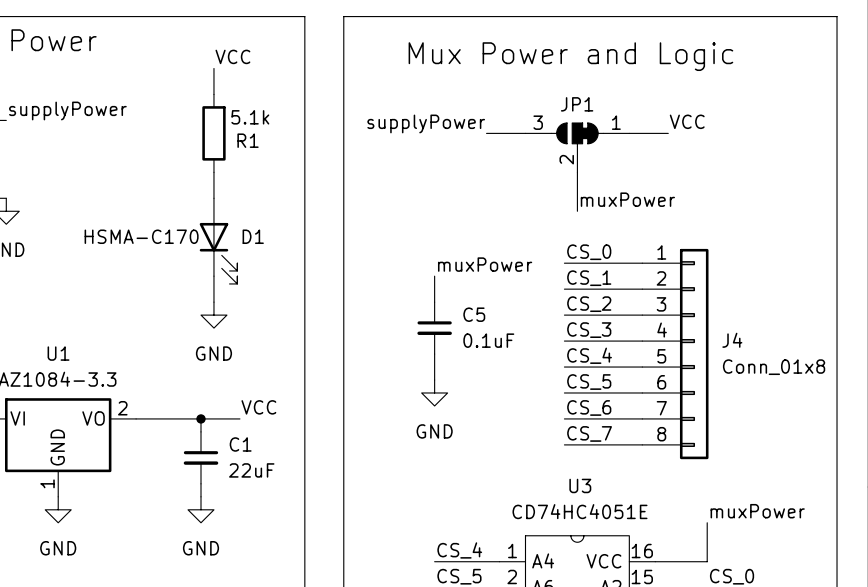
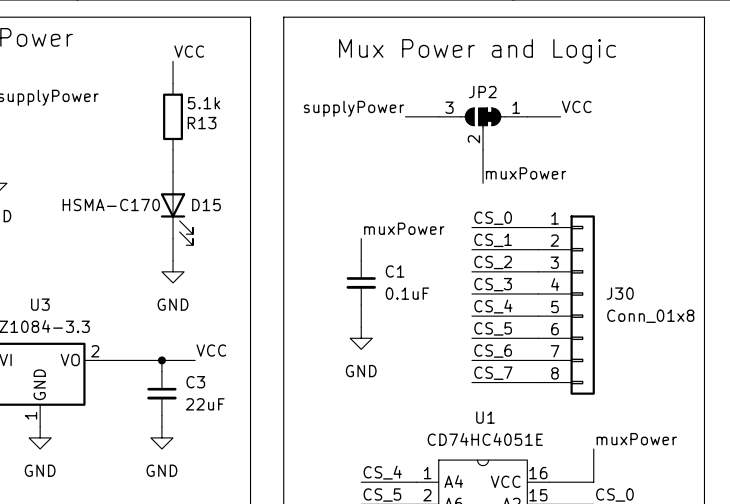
JP1 name: JP1 (577, 104) -> JP2 (482, 92)
R1 name: R1 (248, 140) -> R13 (202, 123)
D1 name: D1 (253, 236) -> D15 (206, 205)
C5 name: C5 (474, 314) -> C1 (395, 271)
J4 name: J4 (732, 340) -> J30 (620, 293)
U1 name: U1 (58, 353) -> U3 (40, 304)
C1 name: C1 (240, 444) -> C3 (195, 382)
U3 name: U3 (580, 485) -> U1 (485, 417)

